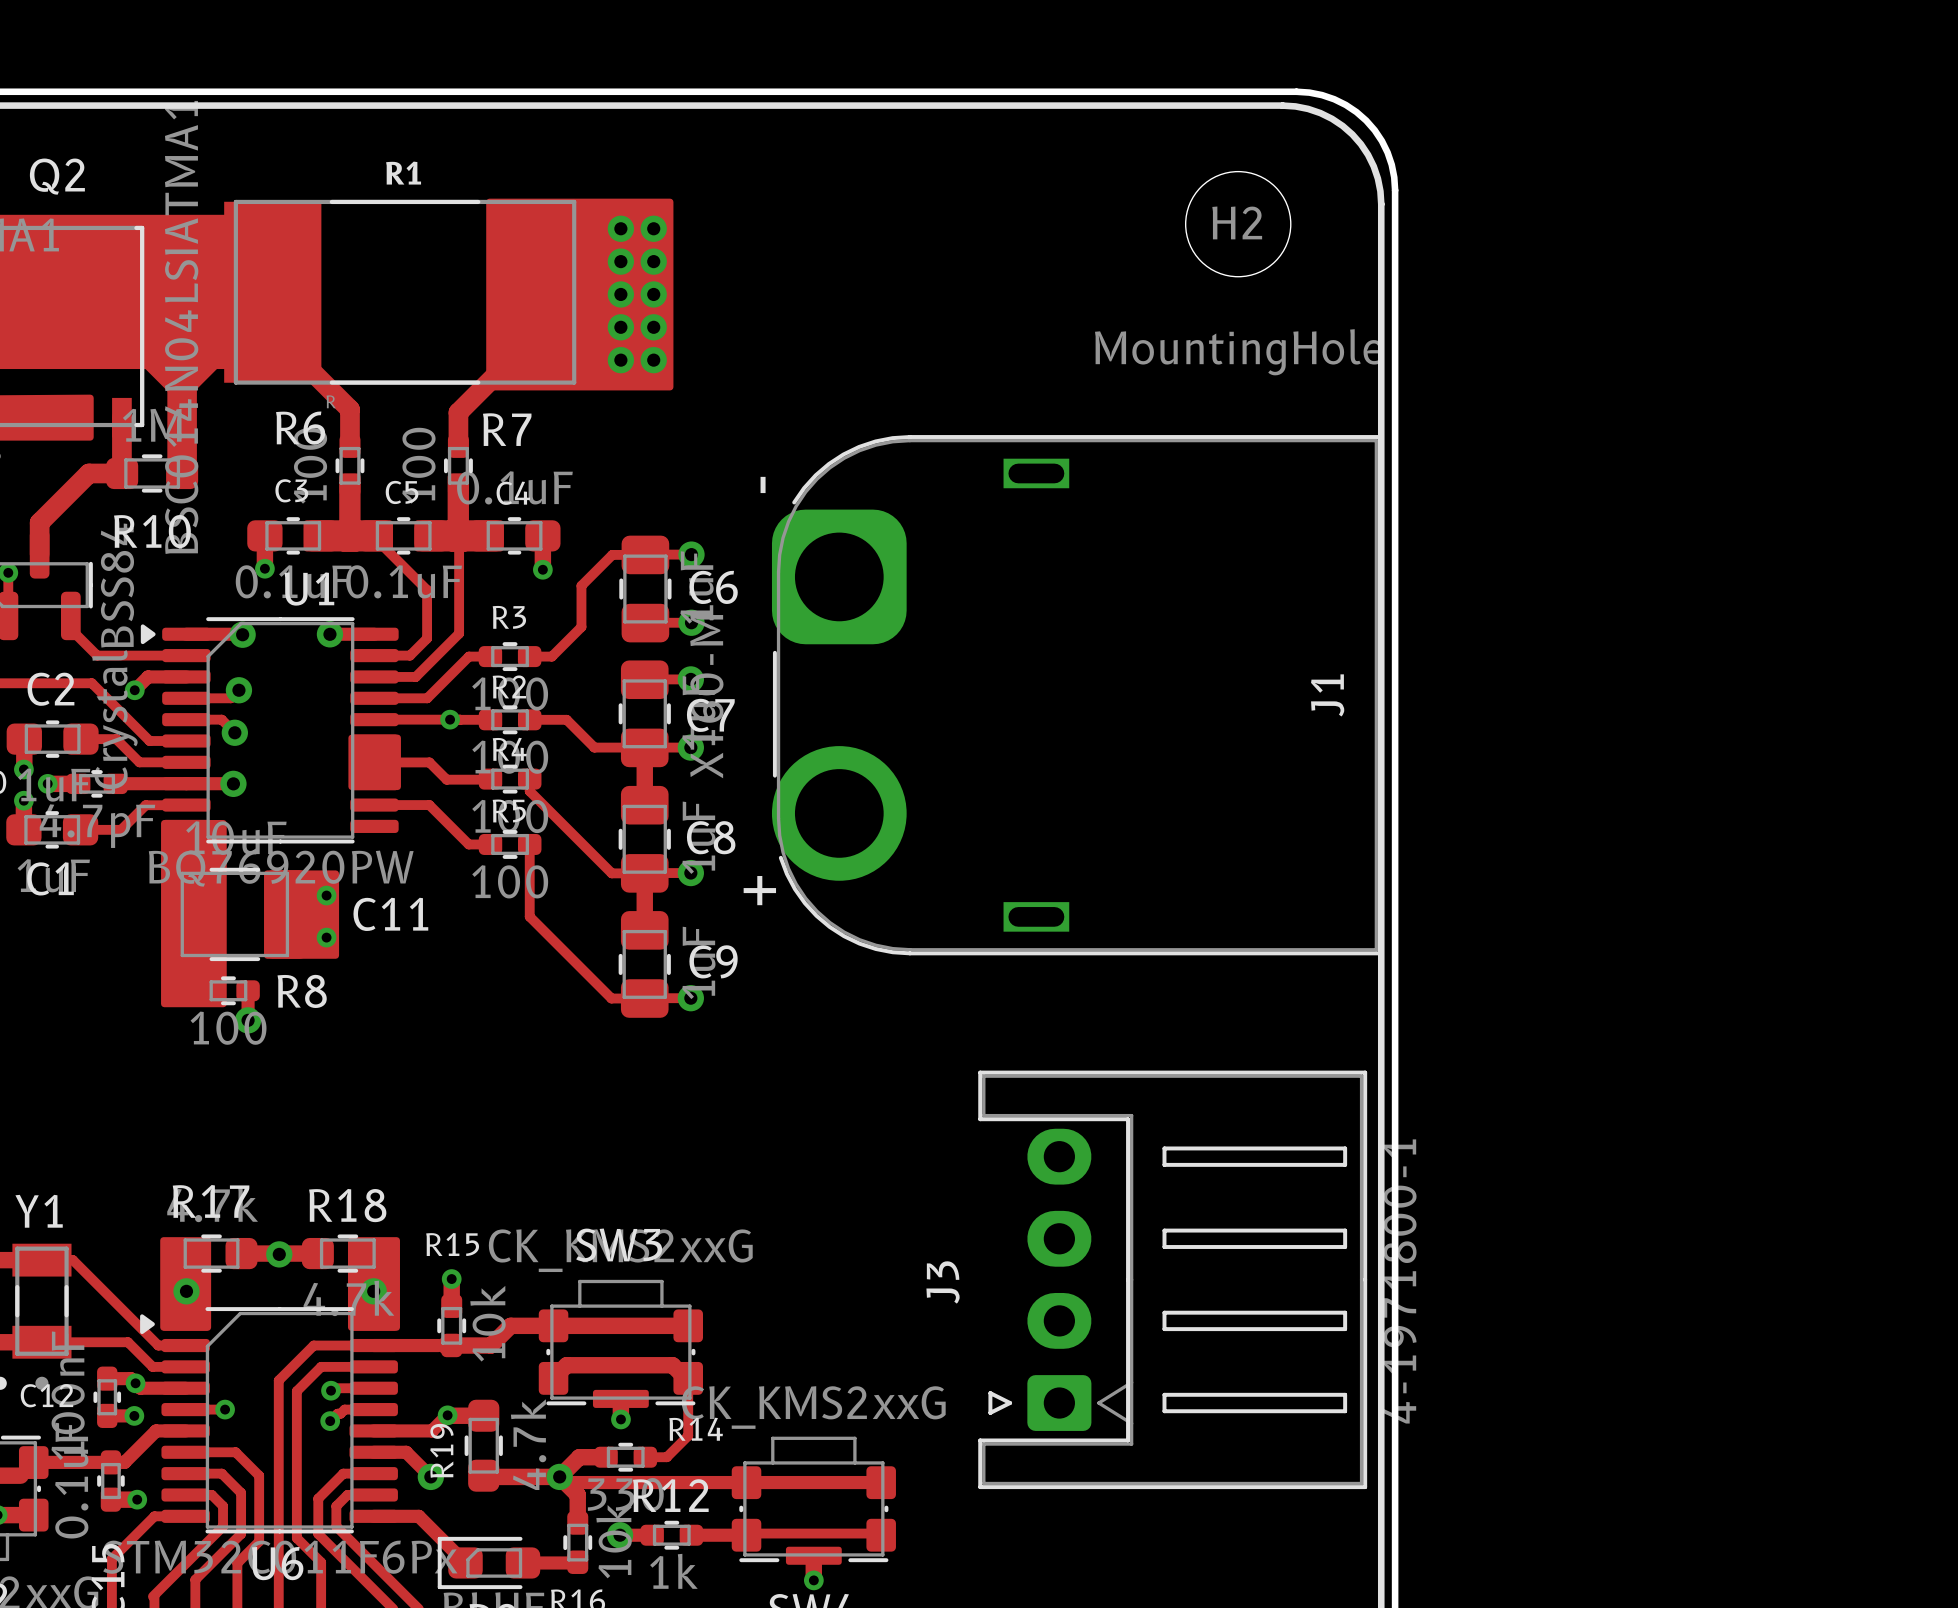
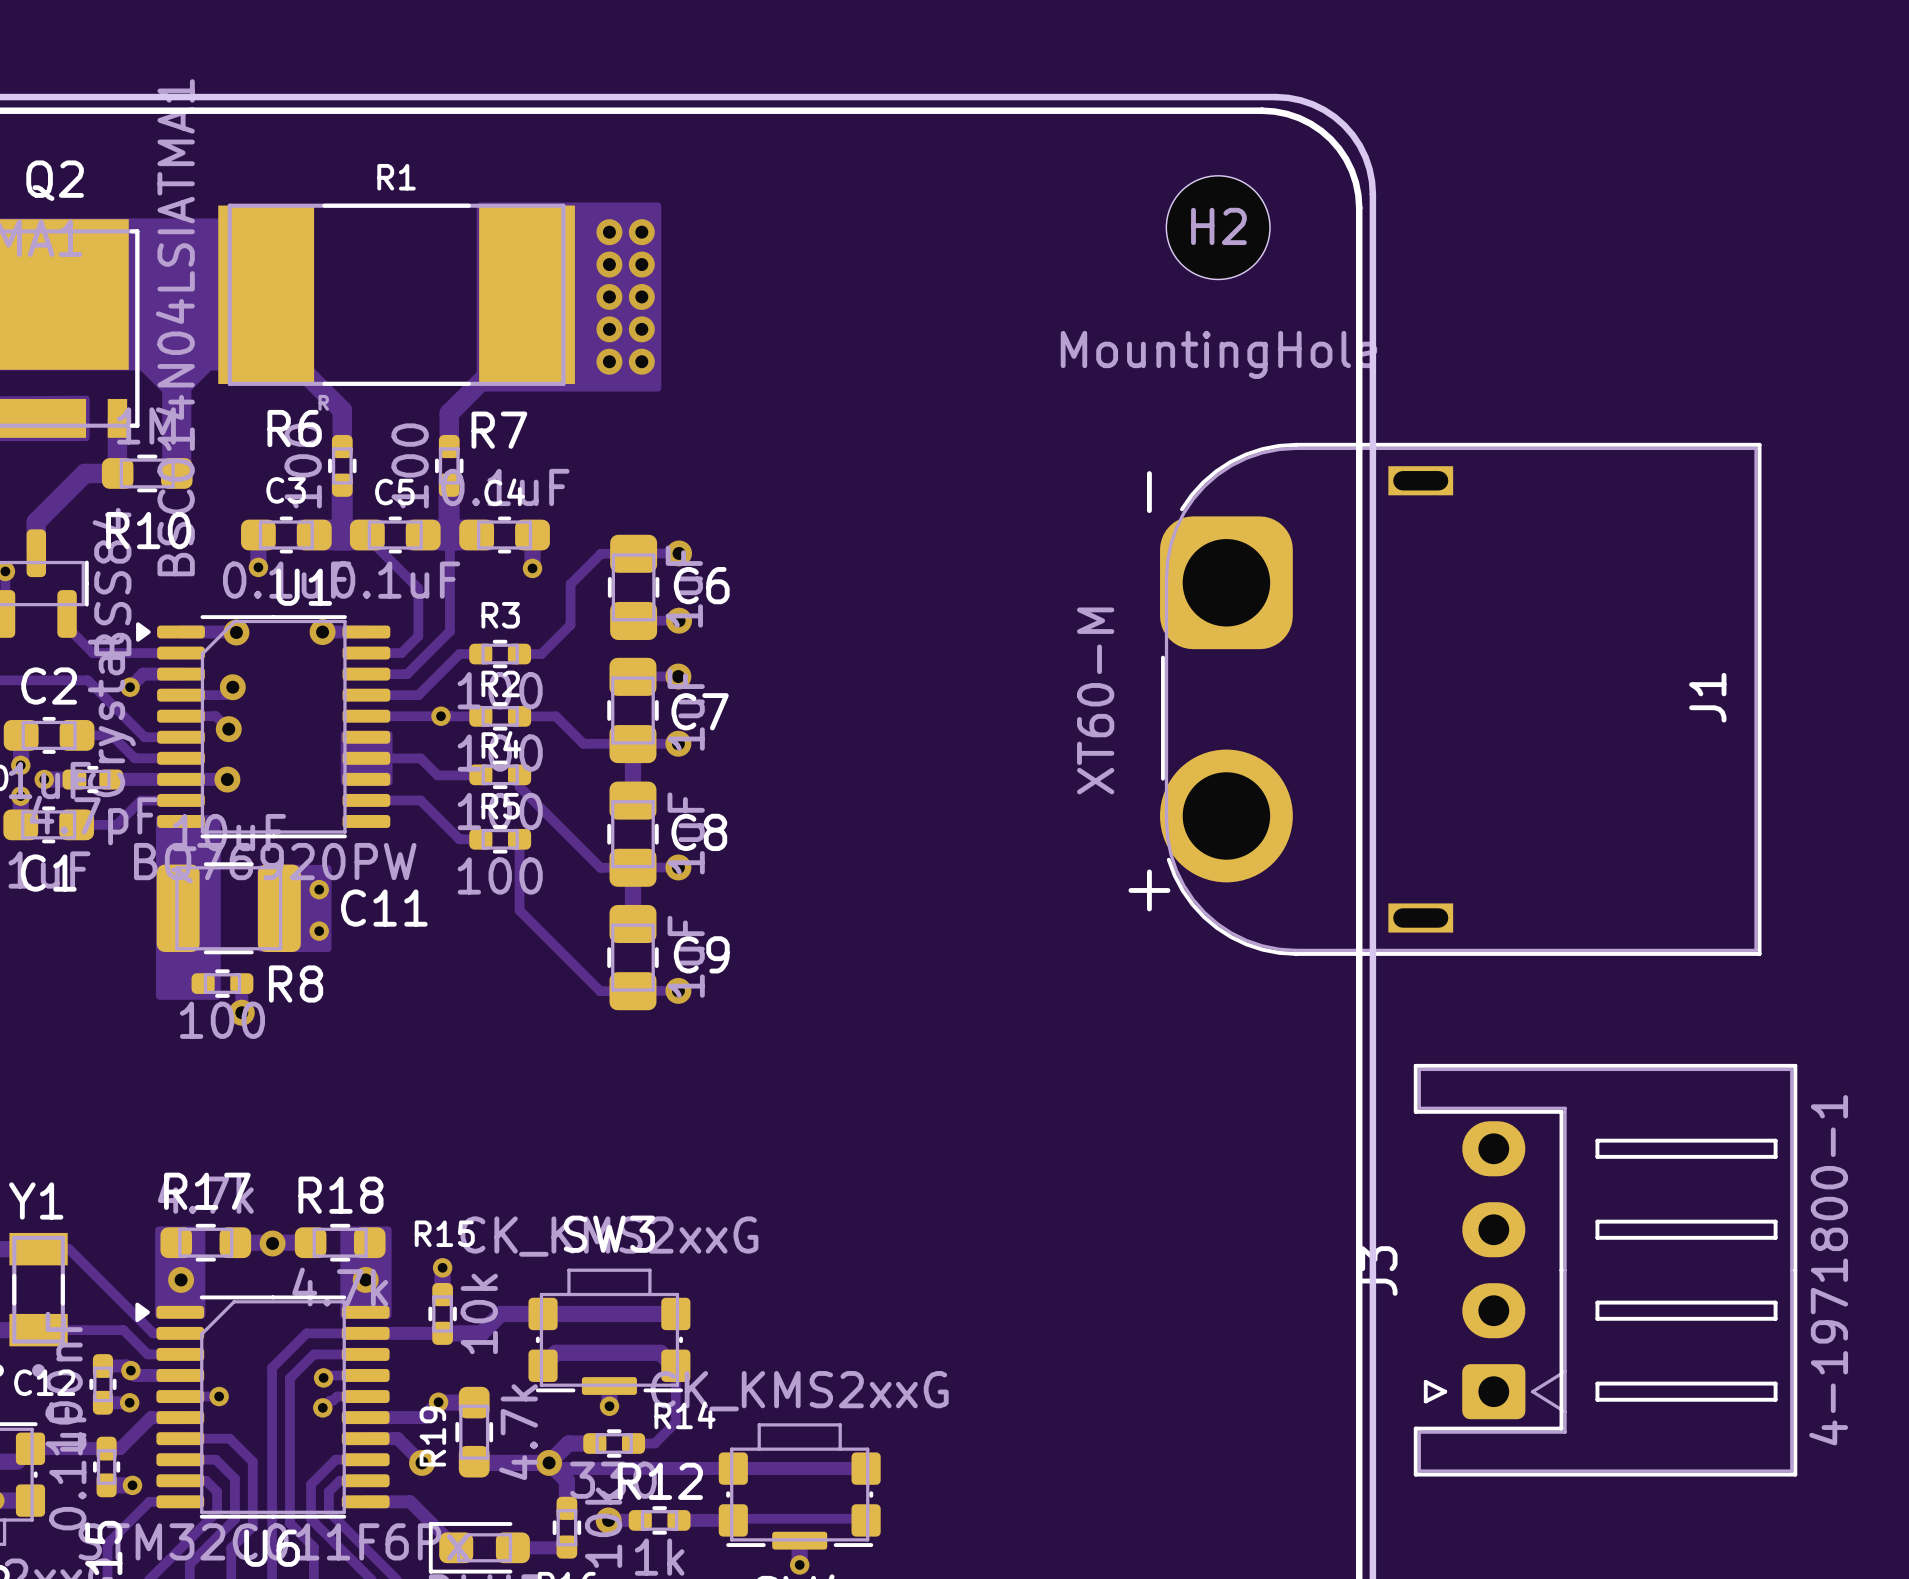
J1 position: (1076, 695) -> (1460, 699)
J3 position: (1172, 1279) -> (1605, 1270)

